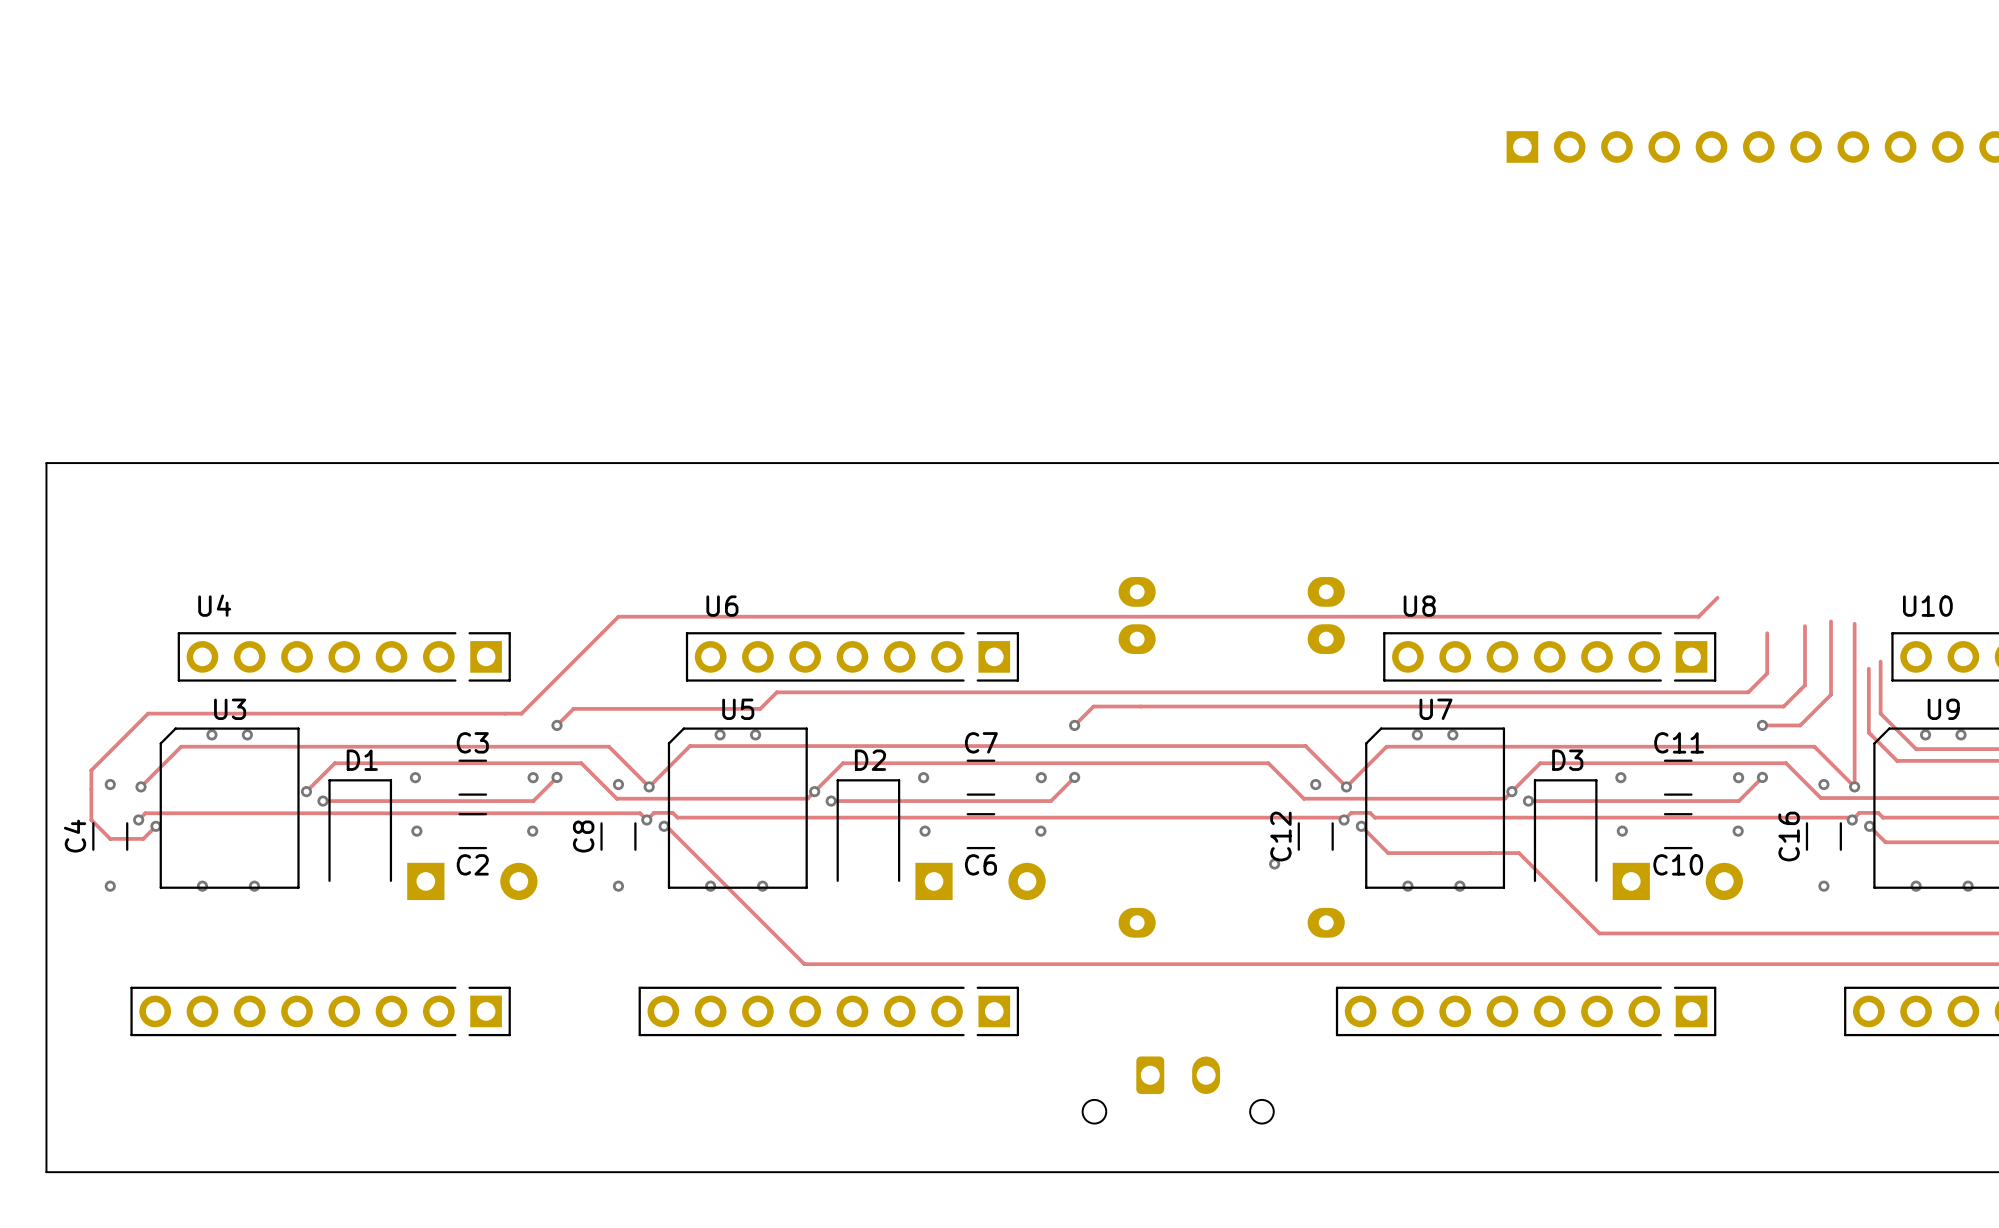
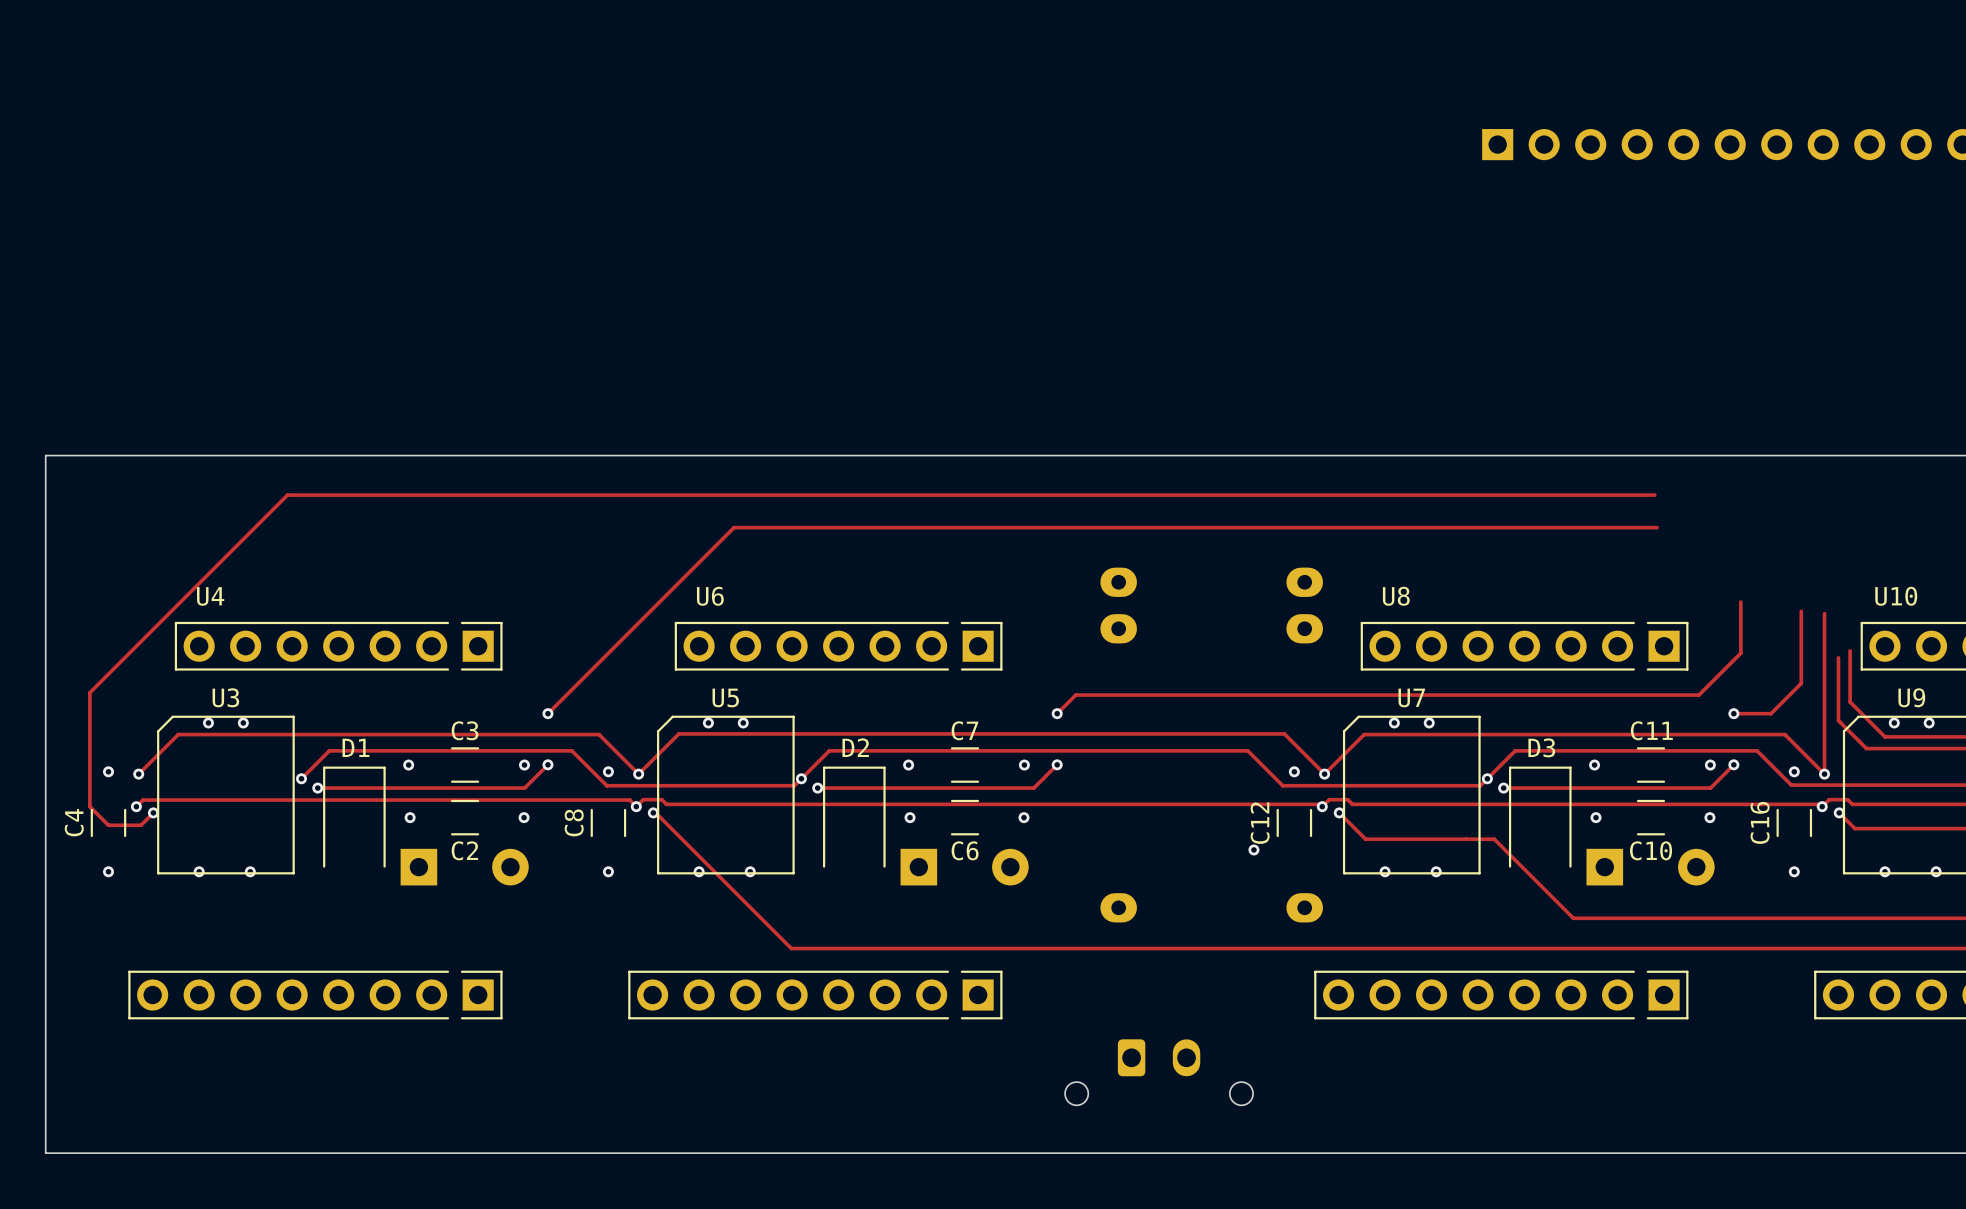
track: (1717, 597) (1698, 616) (618, 616) (521, 713) (148, 713) (91, 770) -> (1654, 495) (287, 495) (89, 692) (89, 757)
track: (1805, 626) (1805, 685) (1783, 706) (1727, 706) -> (1740, 602) (1740, 653) (1698, 695)
track: (1767, 633) (1767, 673) (1748, 692) (776, 692) (760, 708) (573, 708) -> (1657, 527) (733, 527) (564, 697)

